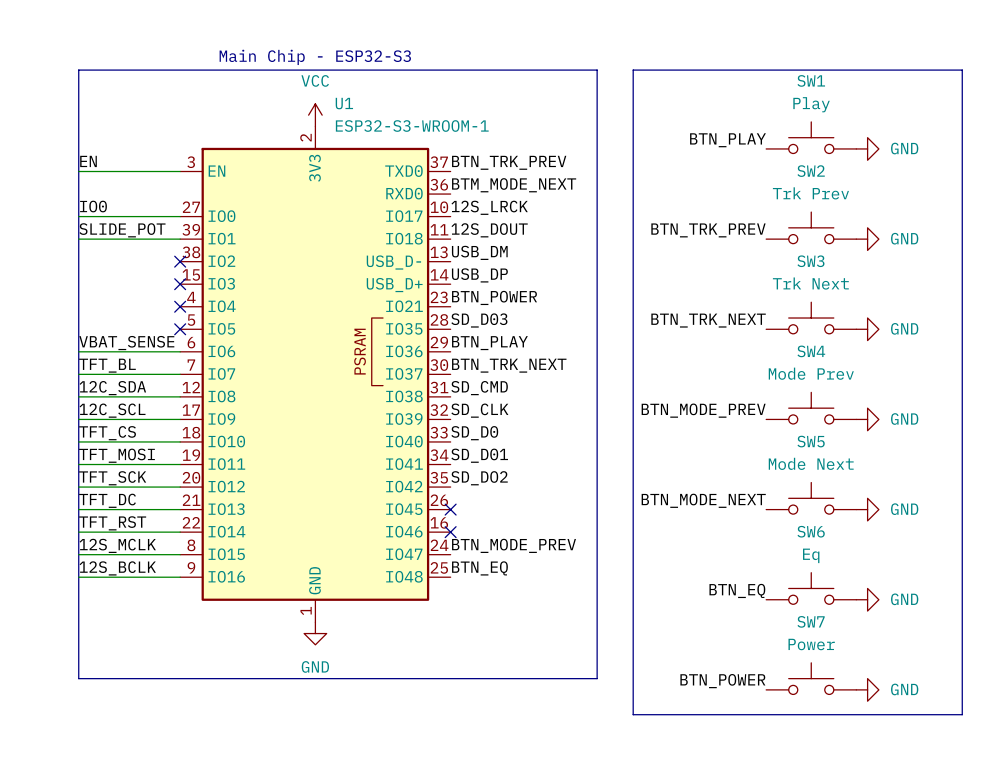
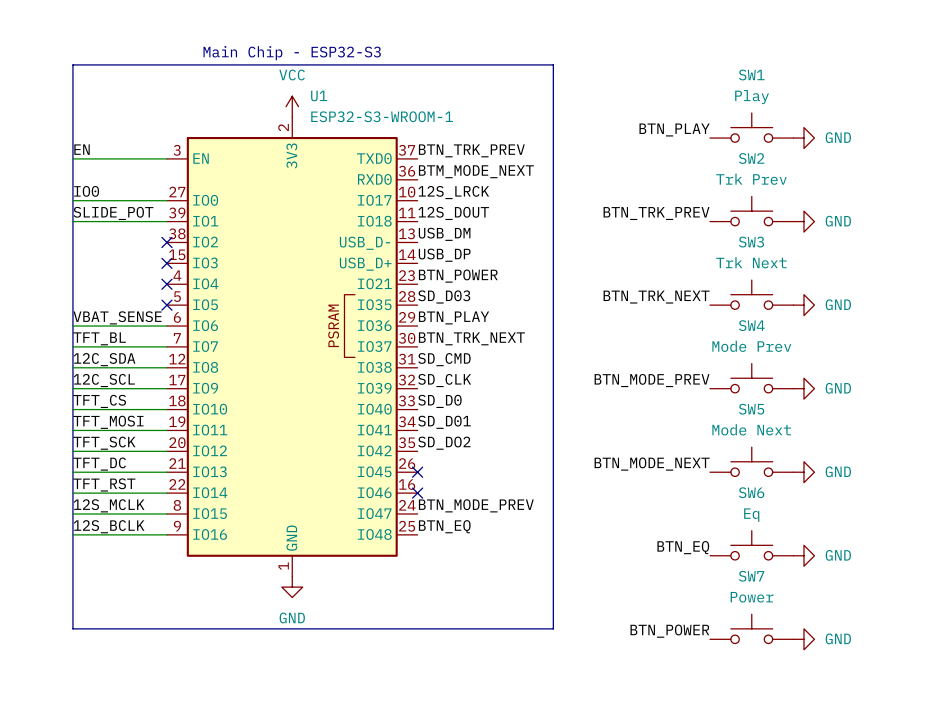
line: (633, 70) (962, 70) (962, 714) (633, 714) (633, 70) -> none

